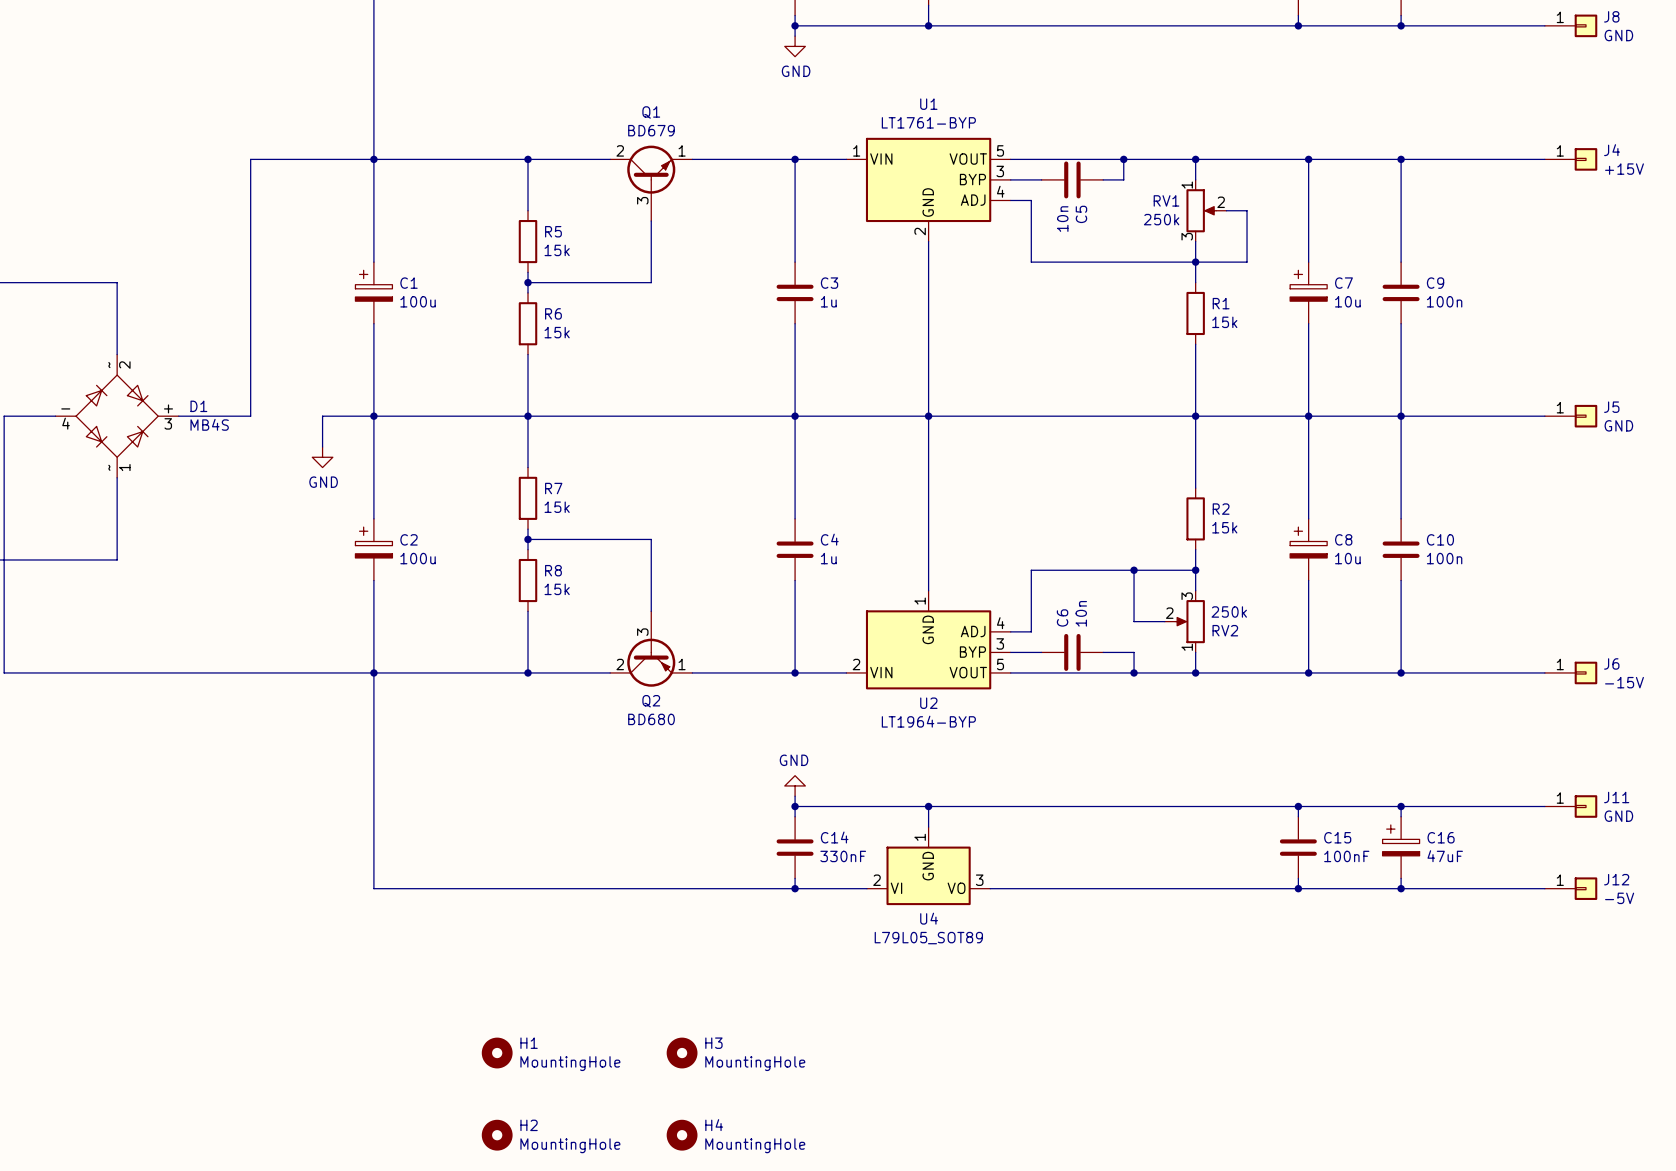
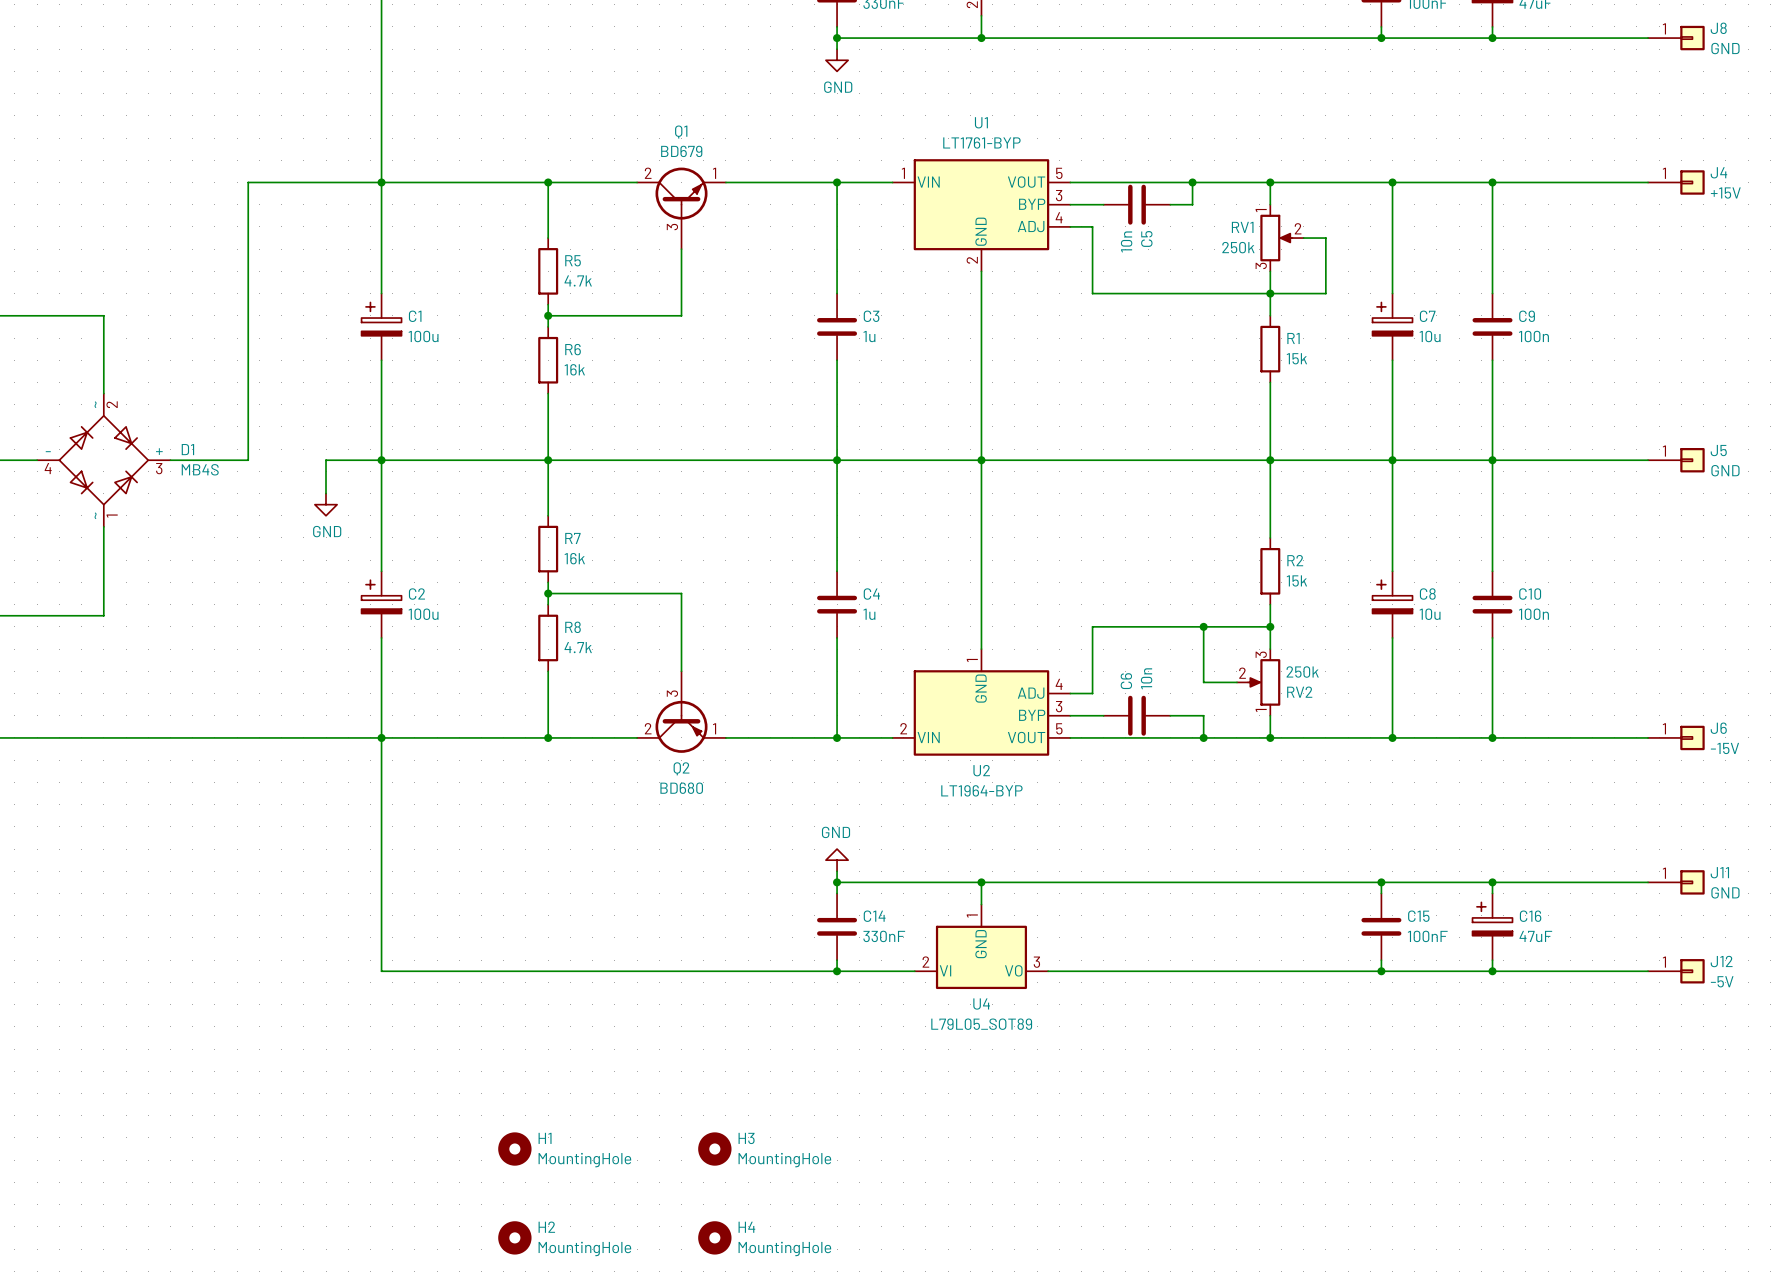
R5 value: 15k (557, 250) -> 4.7k (578, 280)
R6 value: 15k (557, 332) -> 16k (574, 369)
R7 value: 15k (557, 507) -> 16k (574, 558)
R8 value: 15k (557, 589) -> 4.7k (578, 647)

